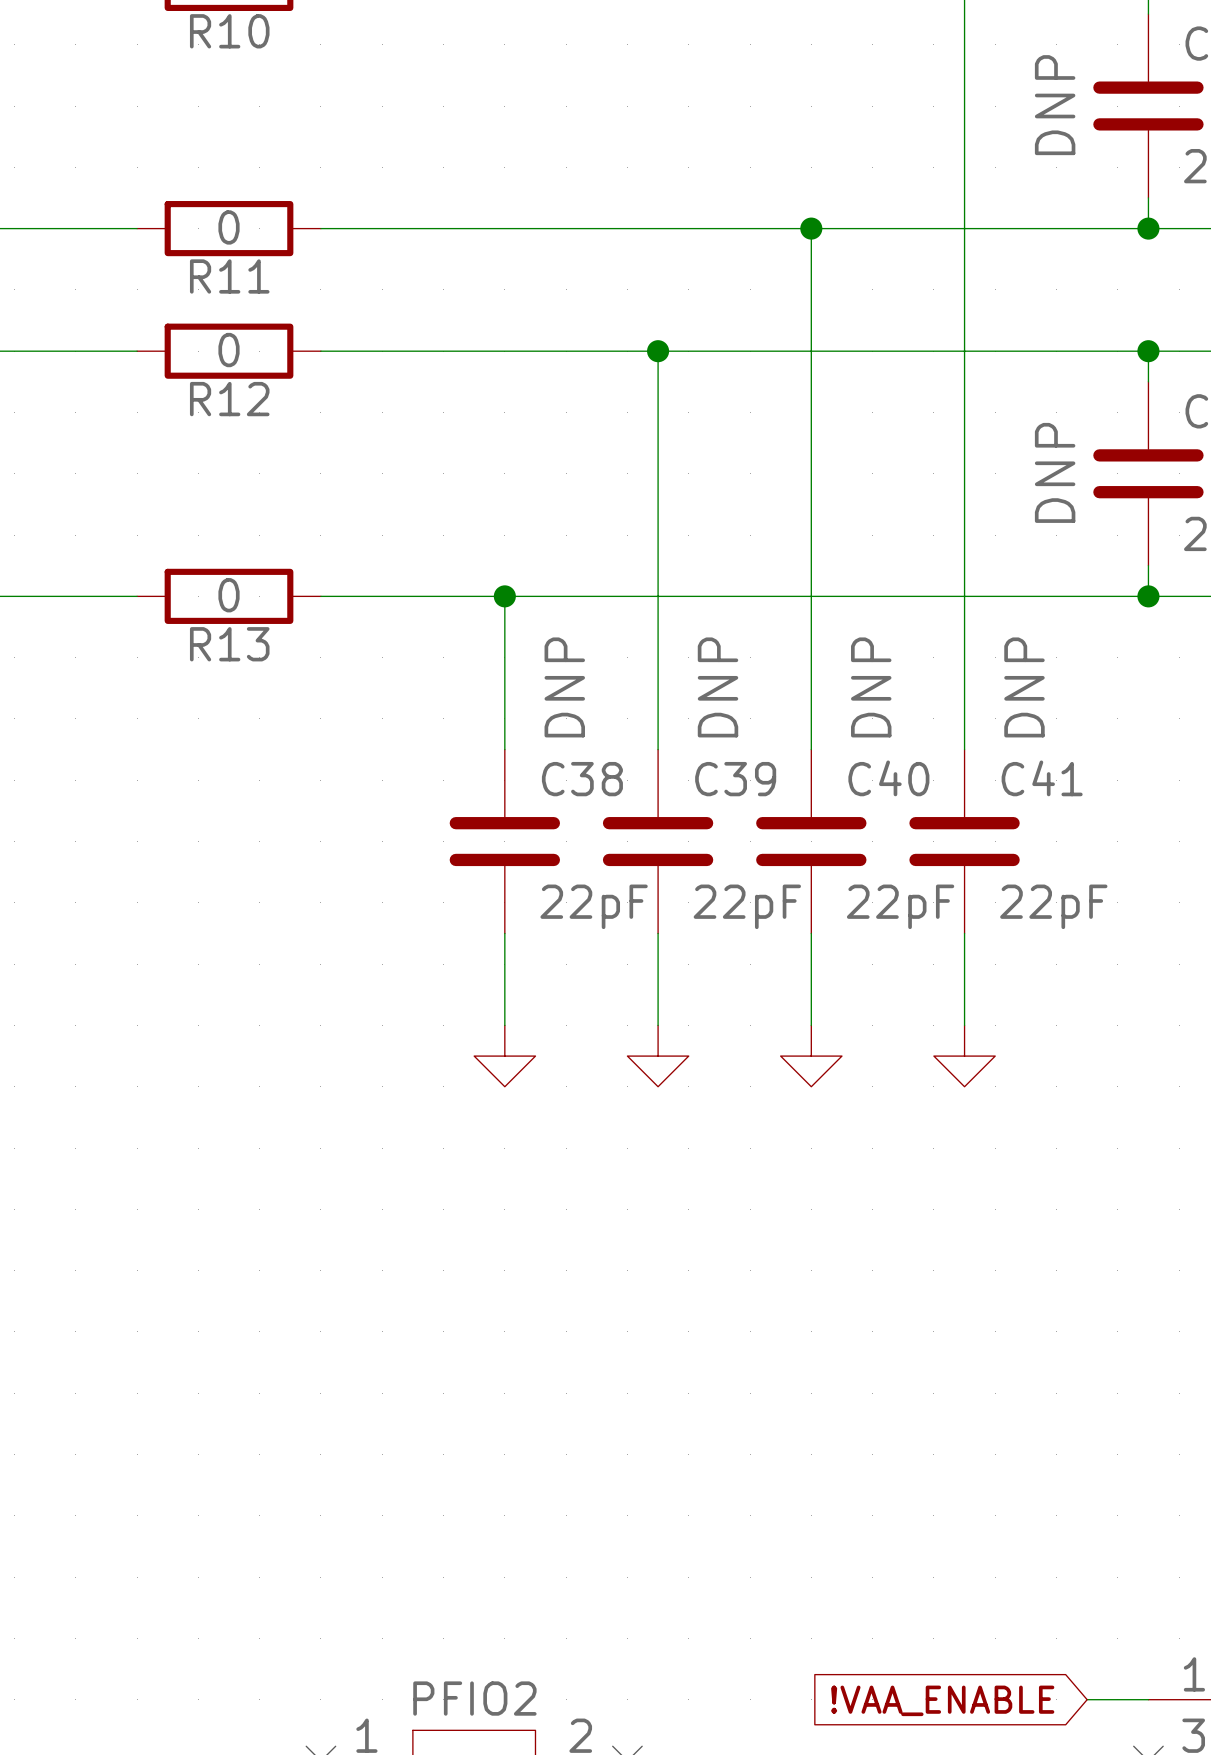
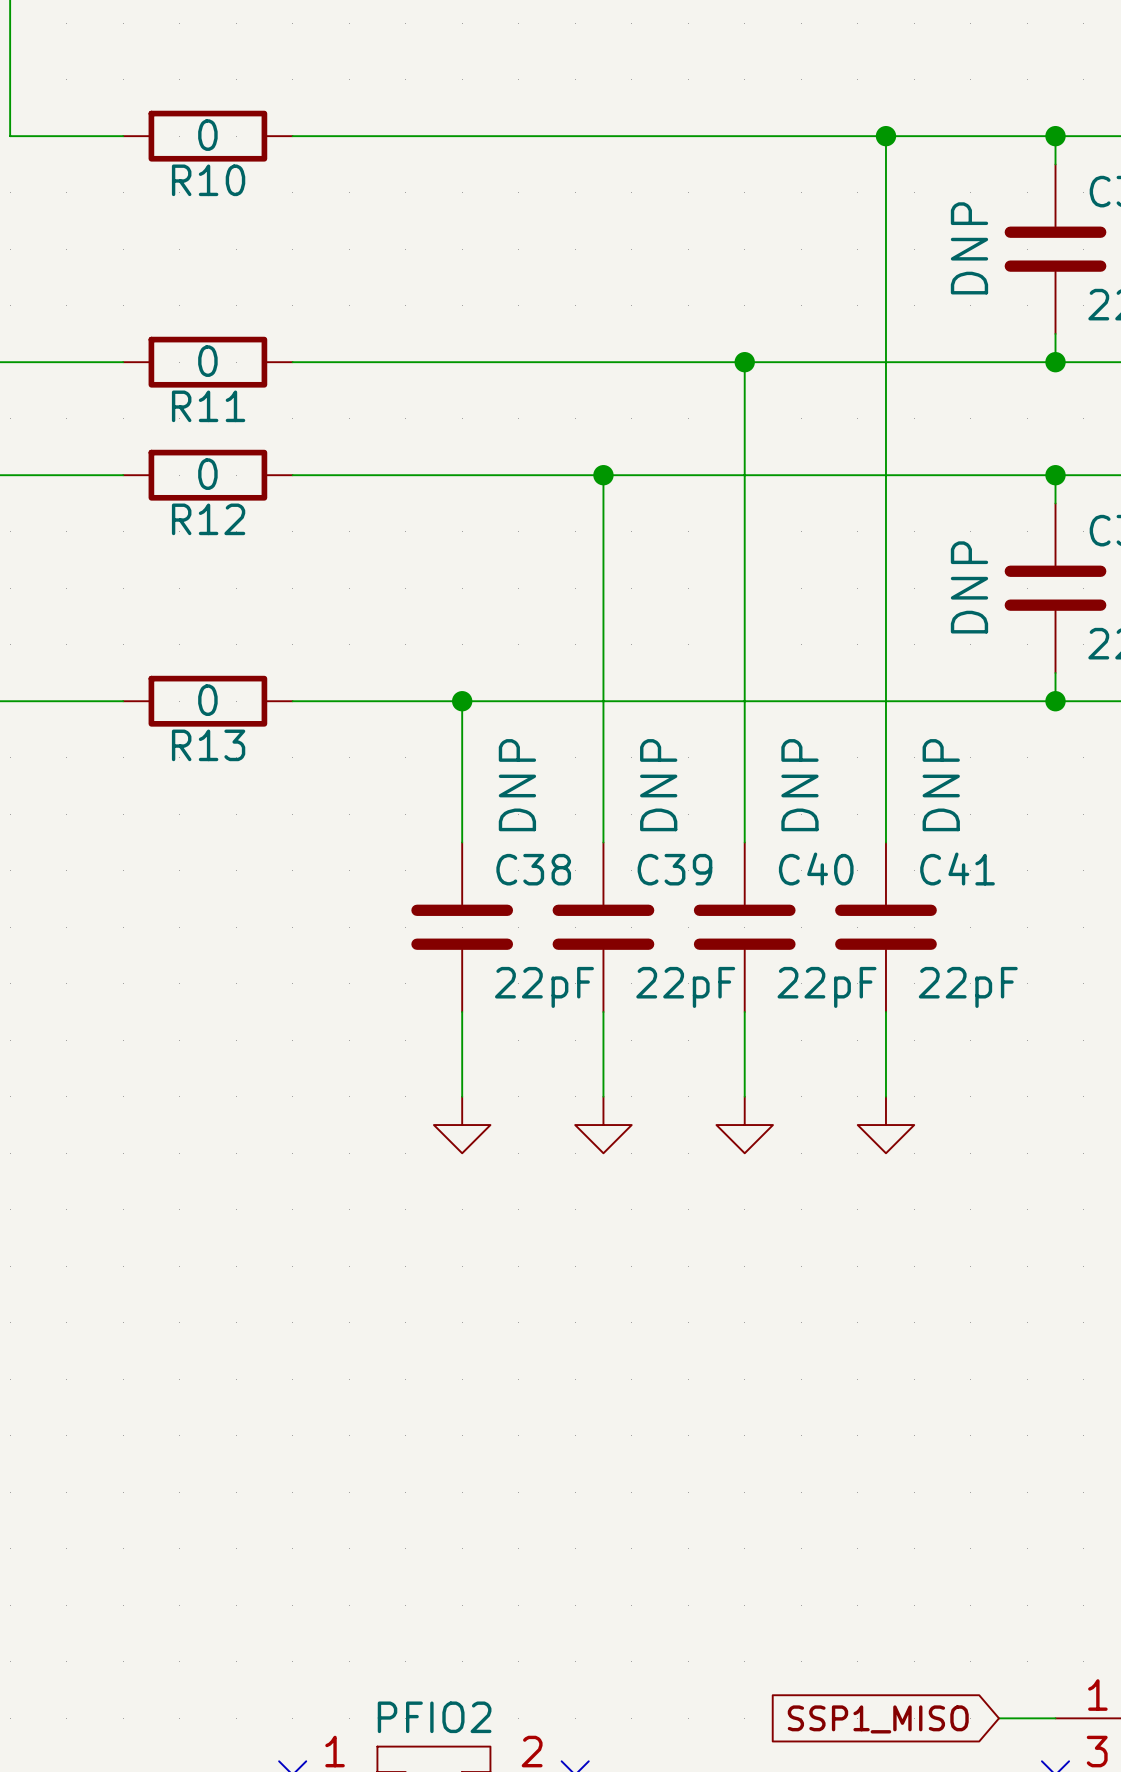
global label: !VAA_ENABLE (942, 1700) -> SSP1_MISO (878, 1719)

